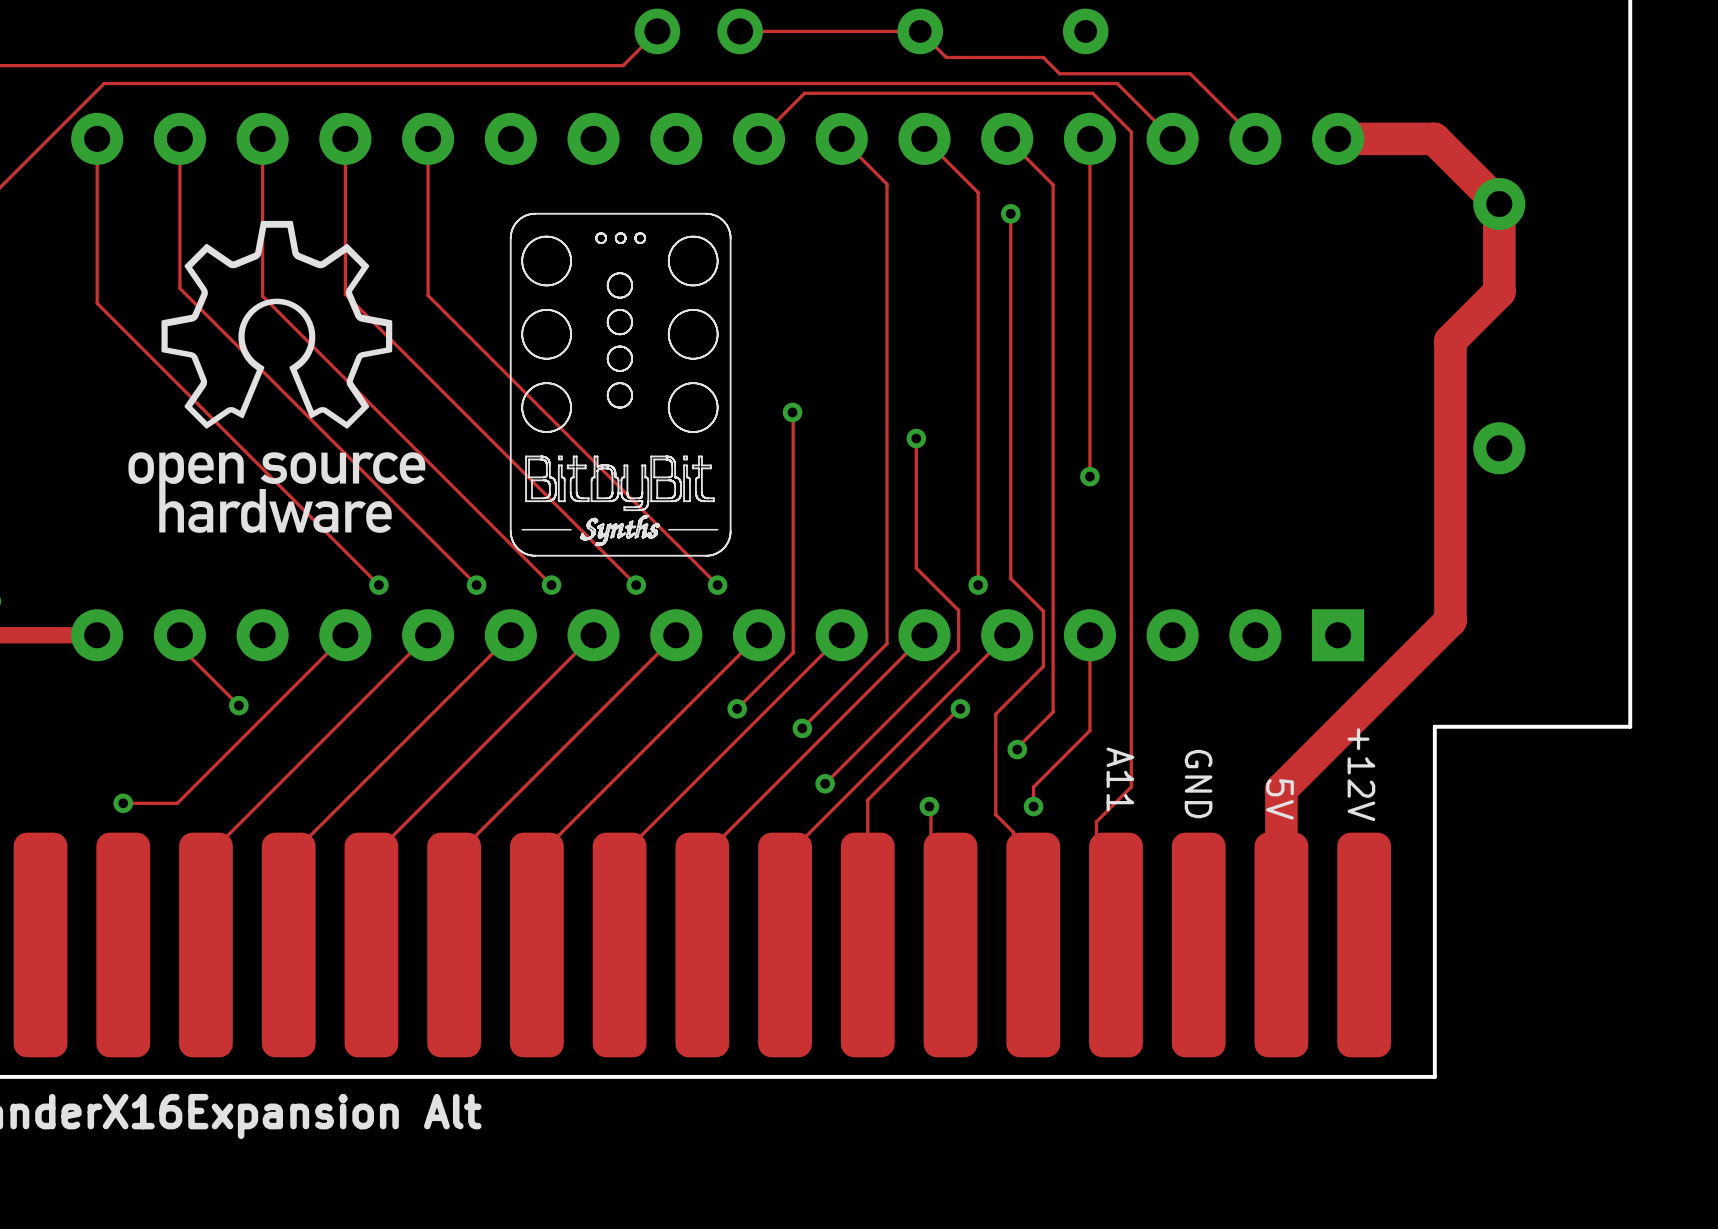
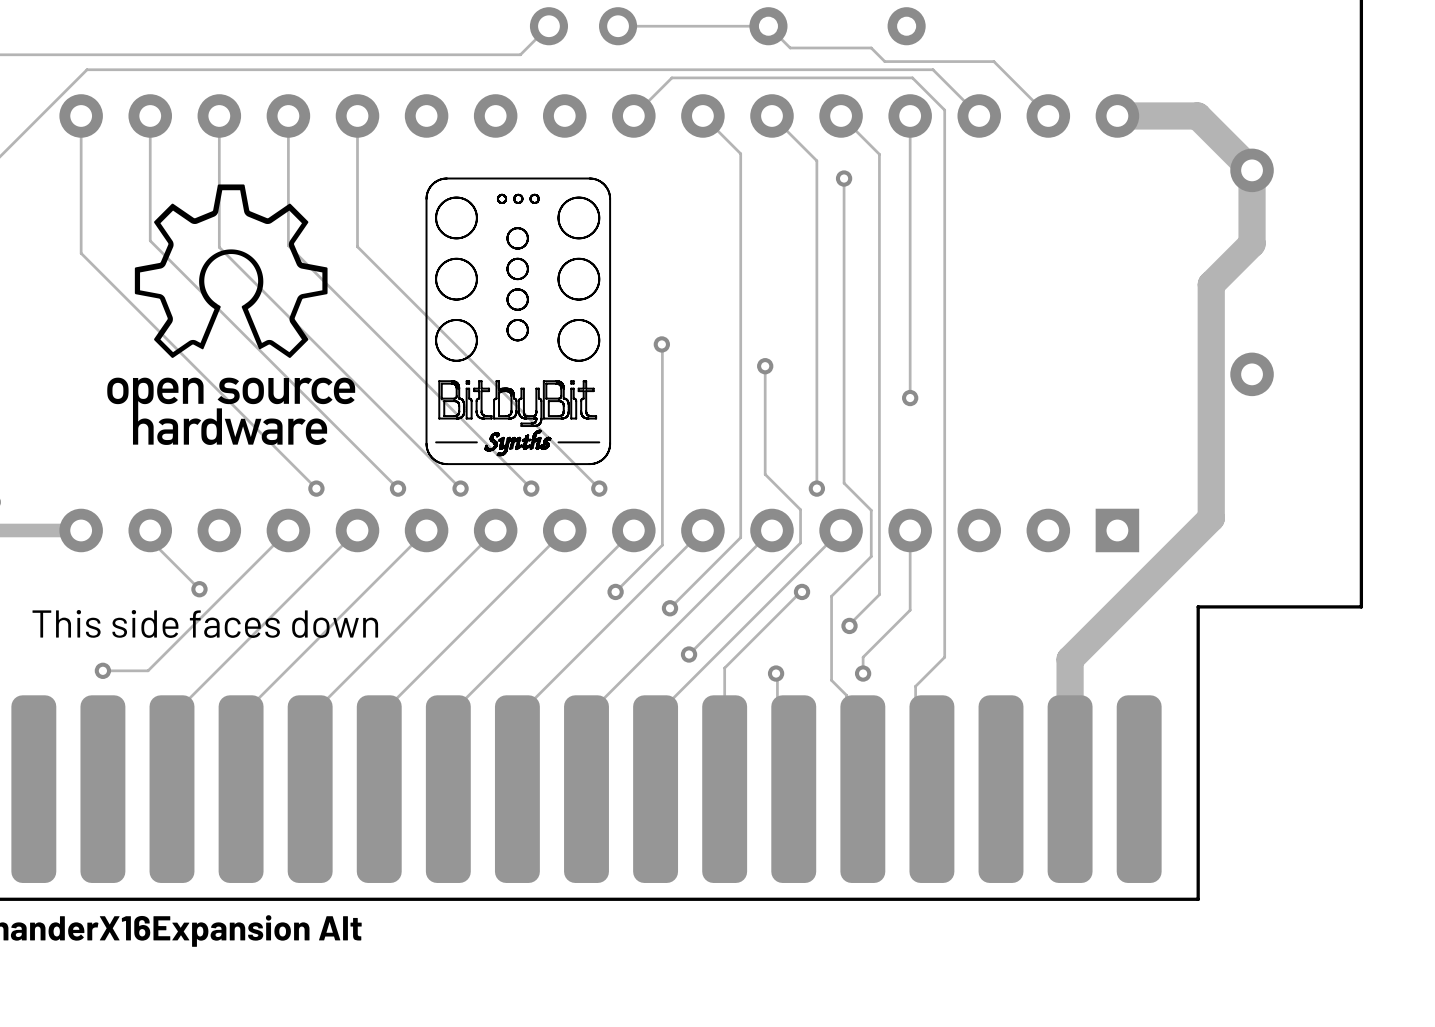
text: none -> This side faces down (205, 623)
text: +12V (1361, 774) -> none
text: A11 (1120, 779) -> none
text: GND (1198, 784) -> none
text: 5V (1280, 799) -> none

